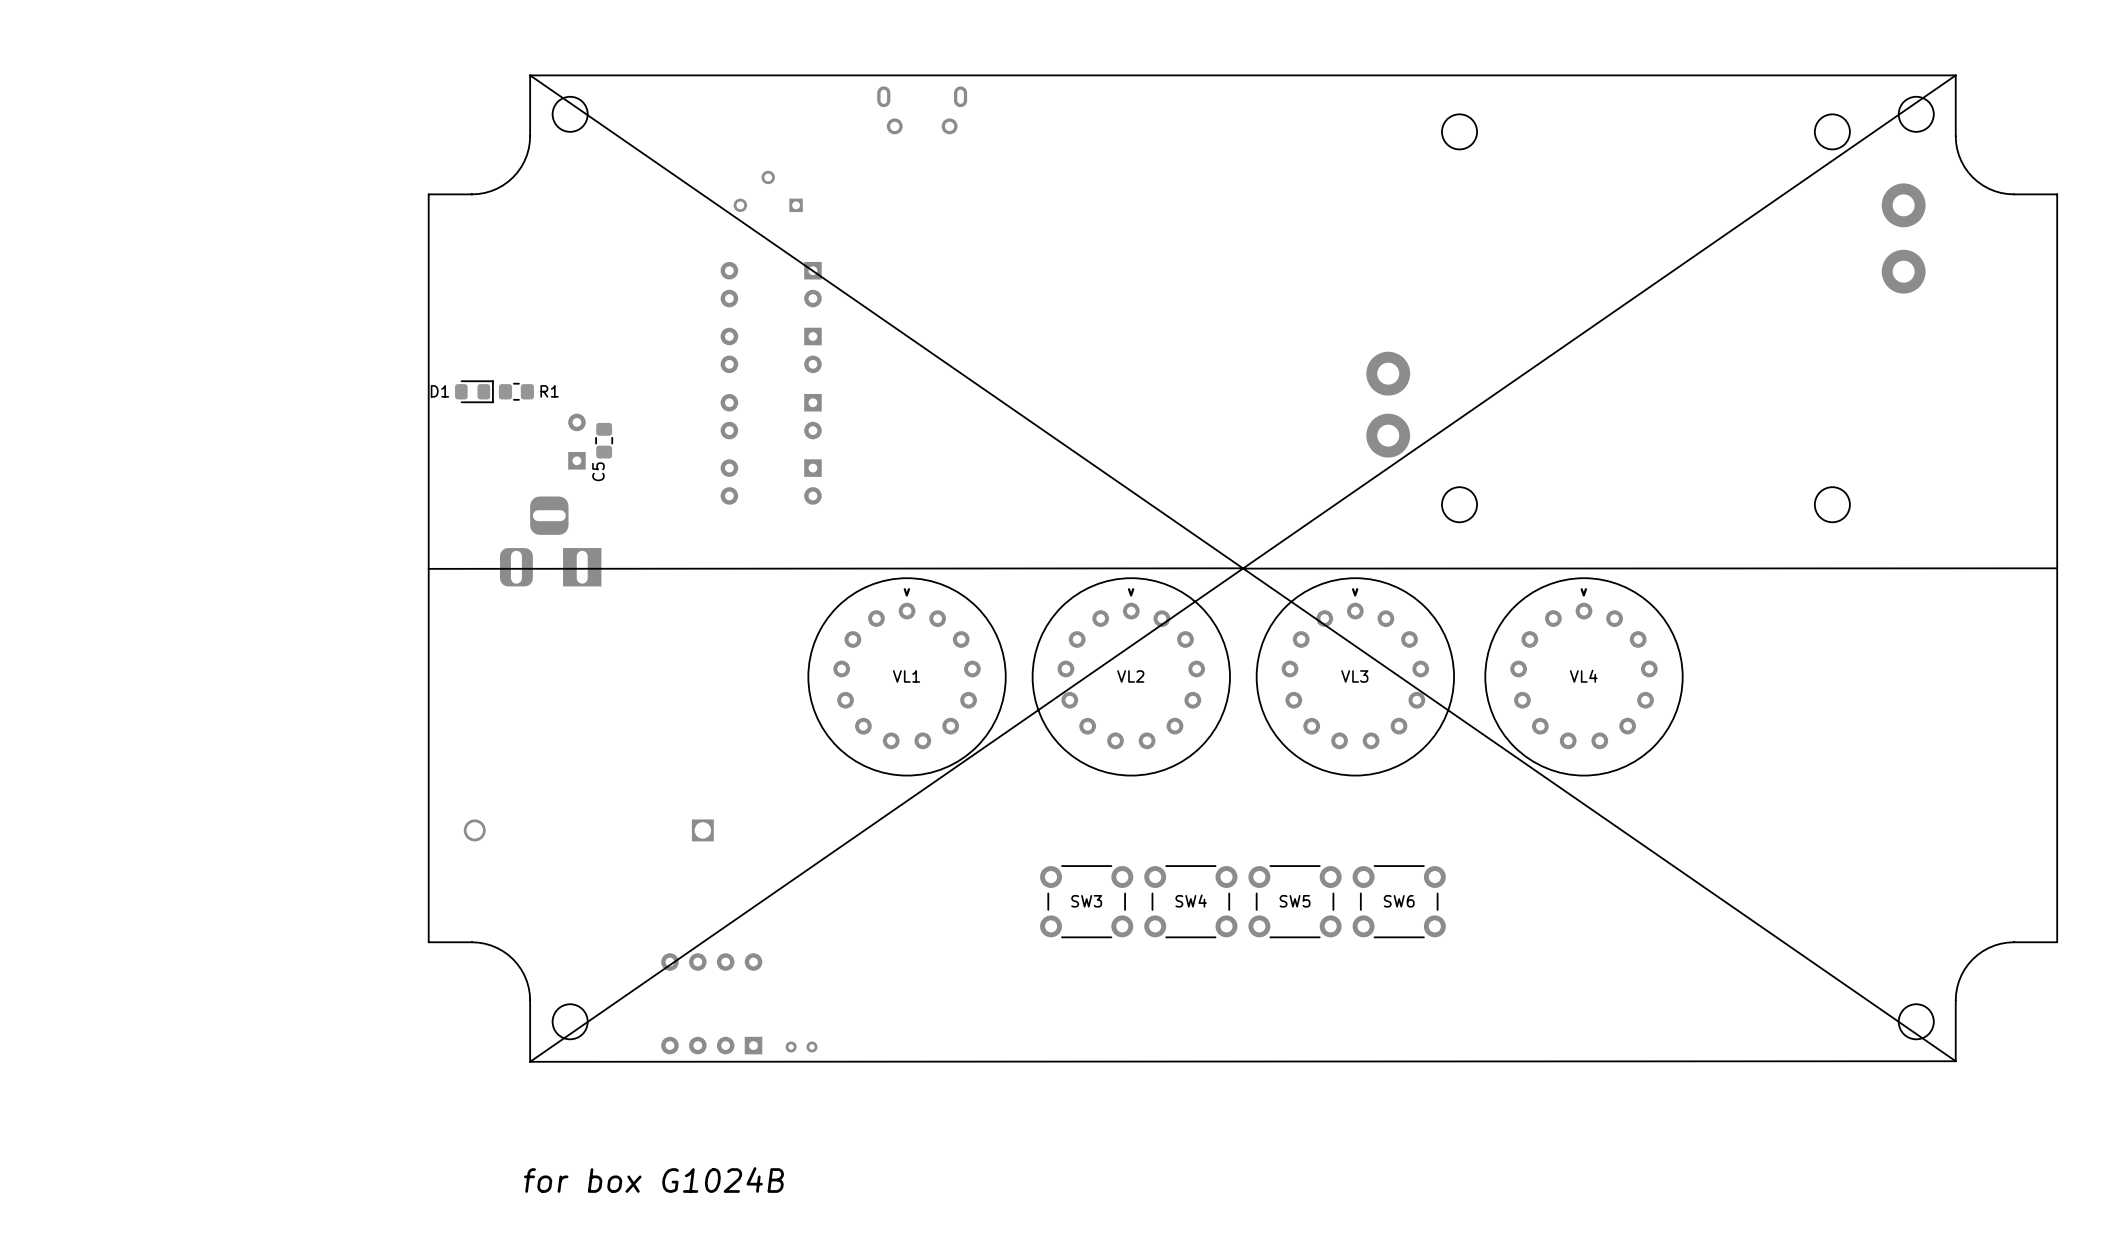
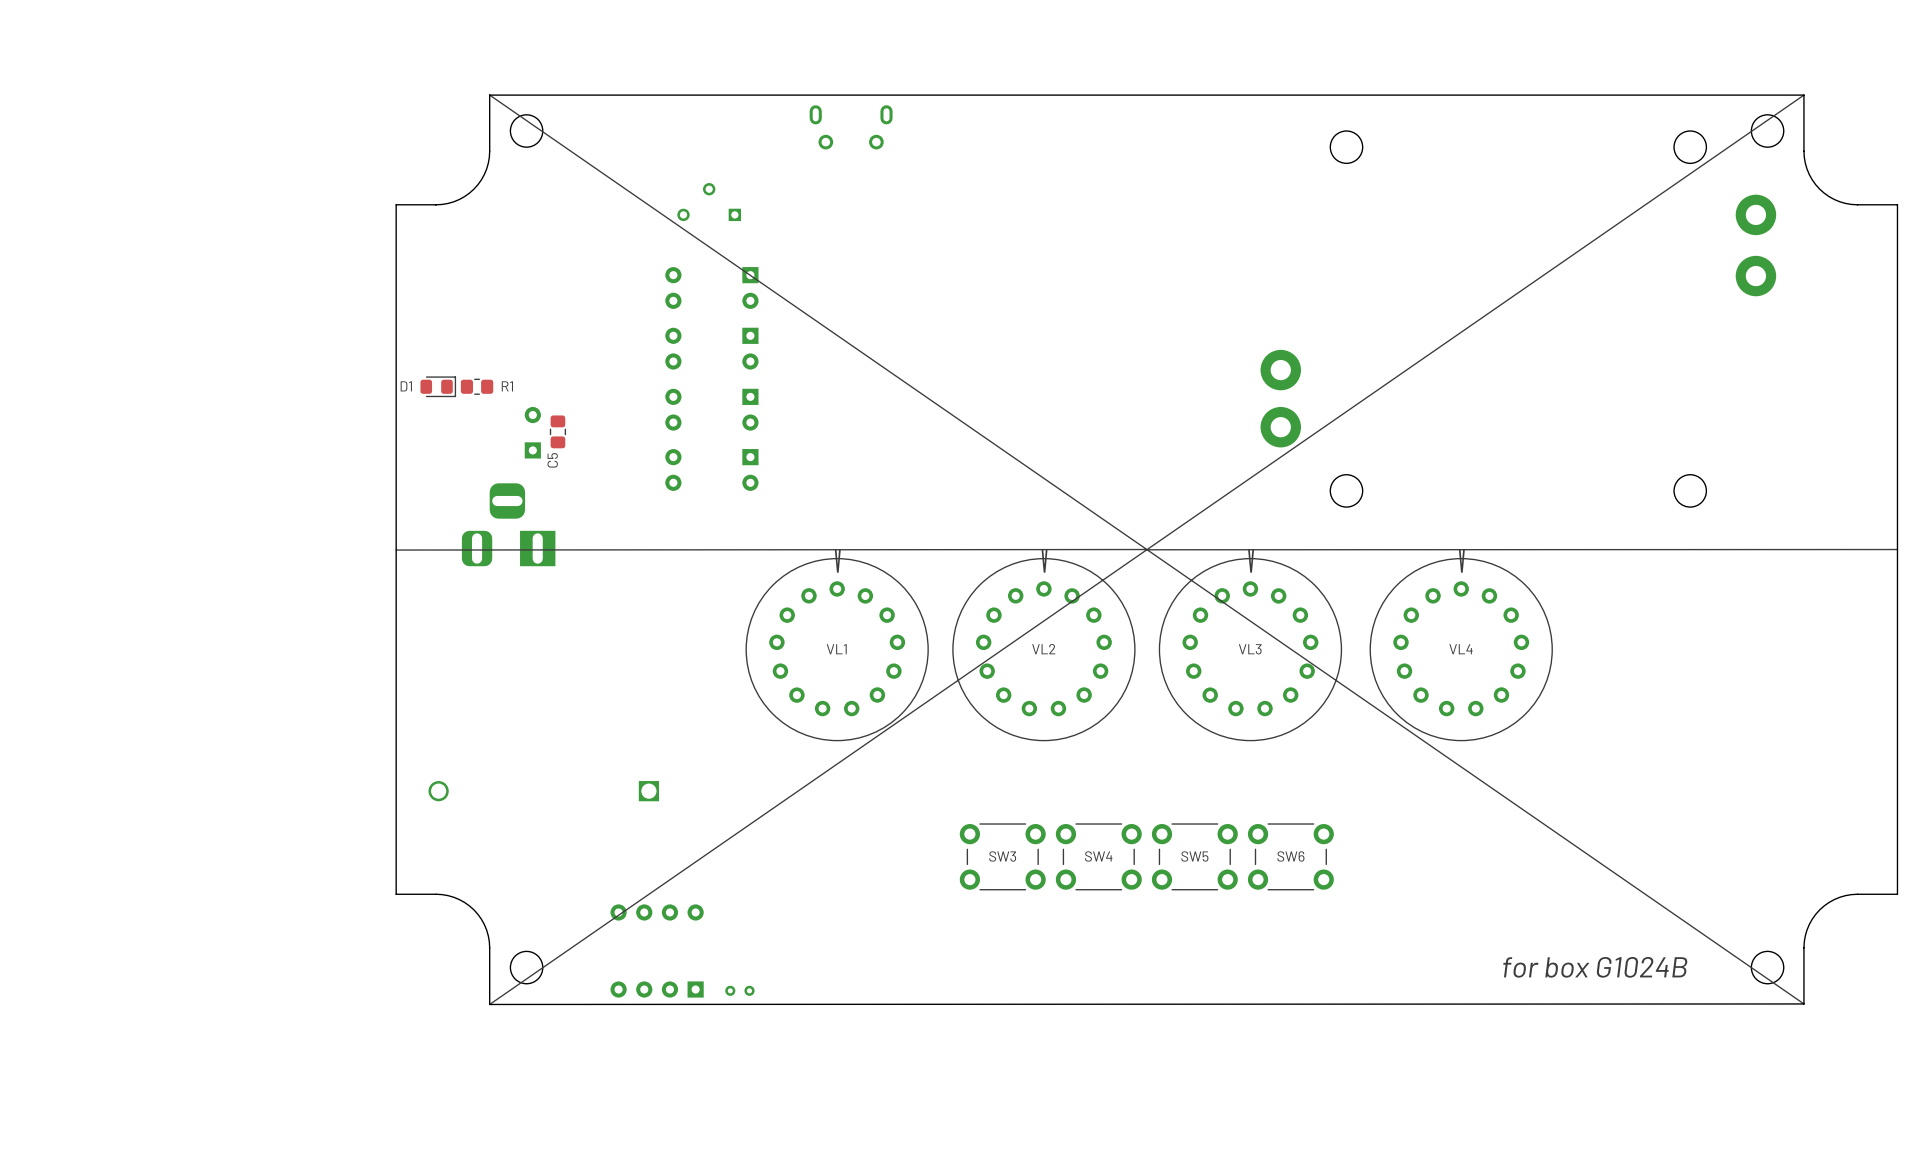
text: none -> for box G1024B (1595, 967)
text: for box G1024B (653, 1179) -> none

